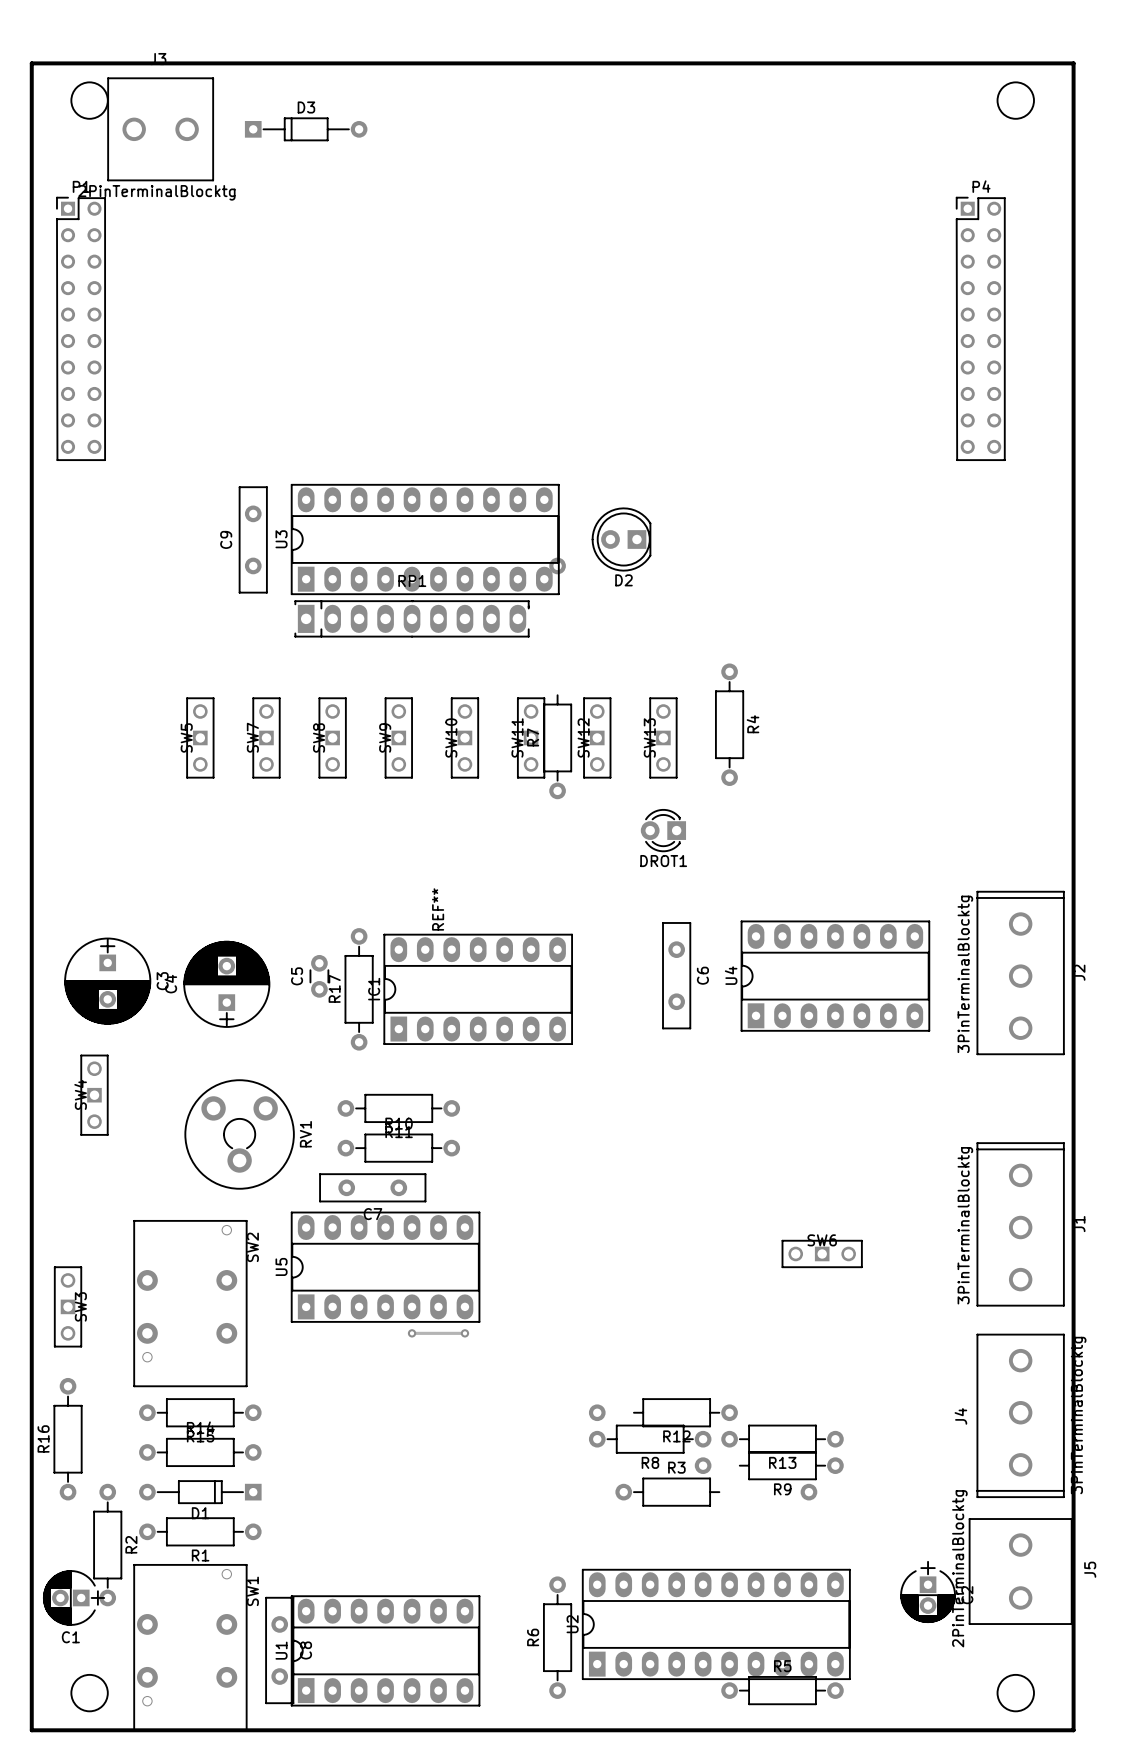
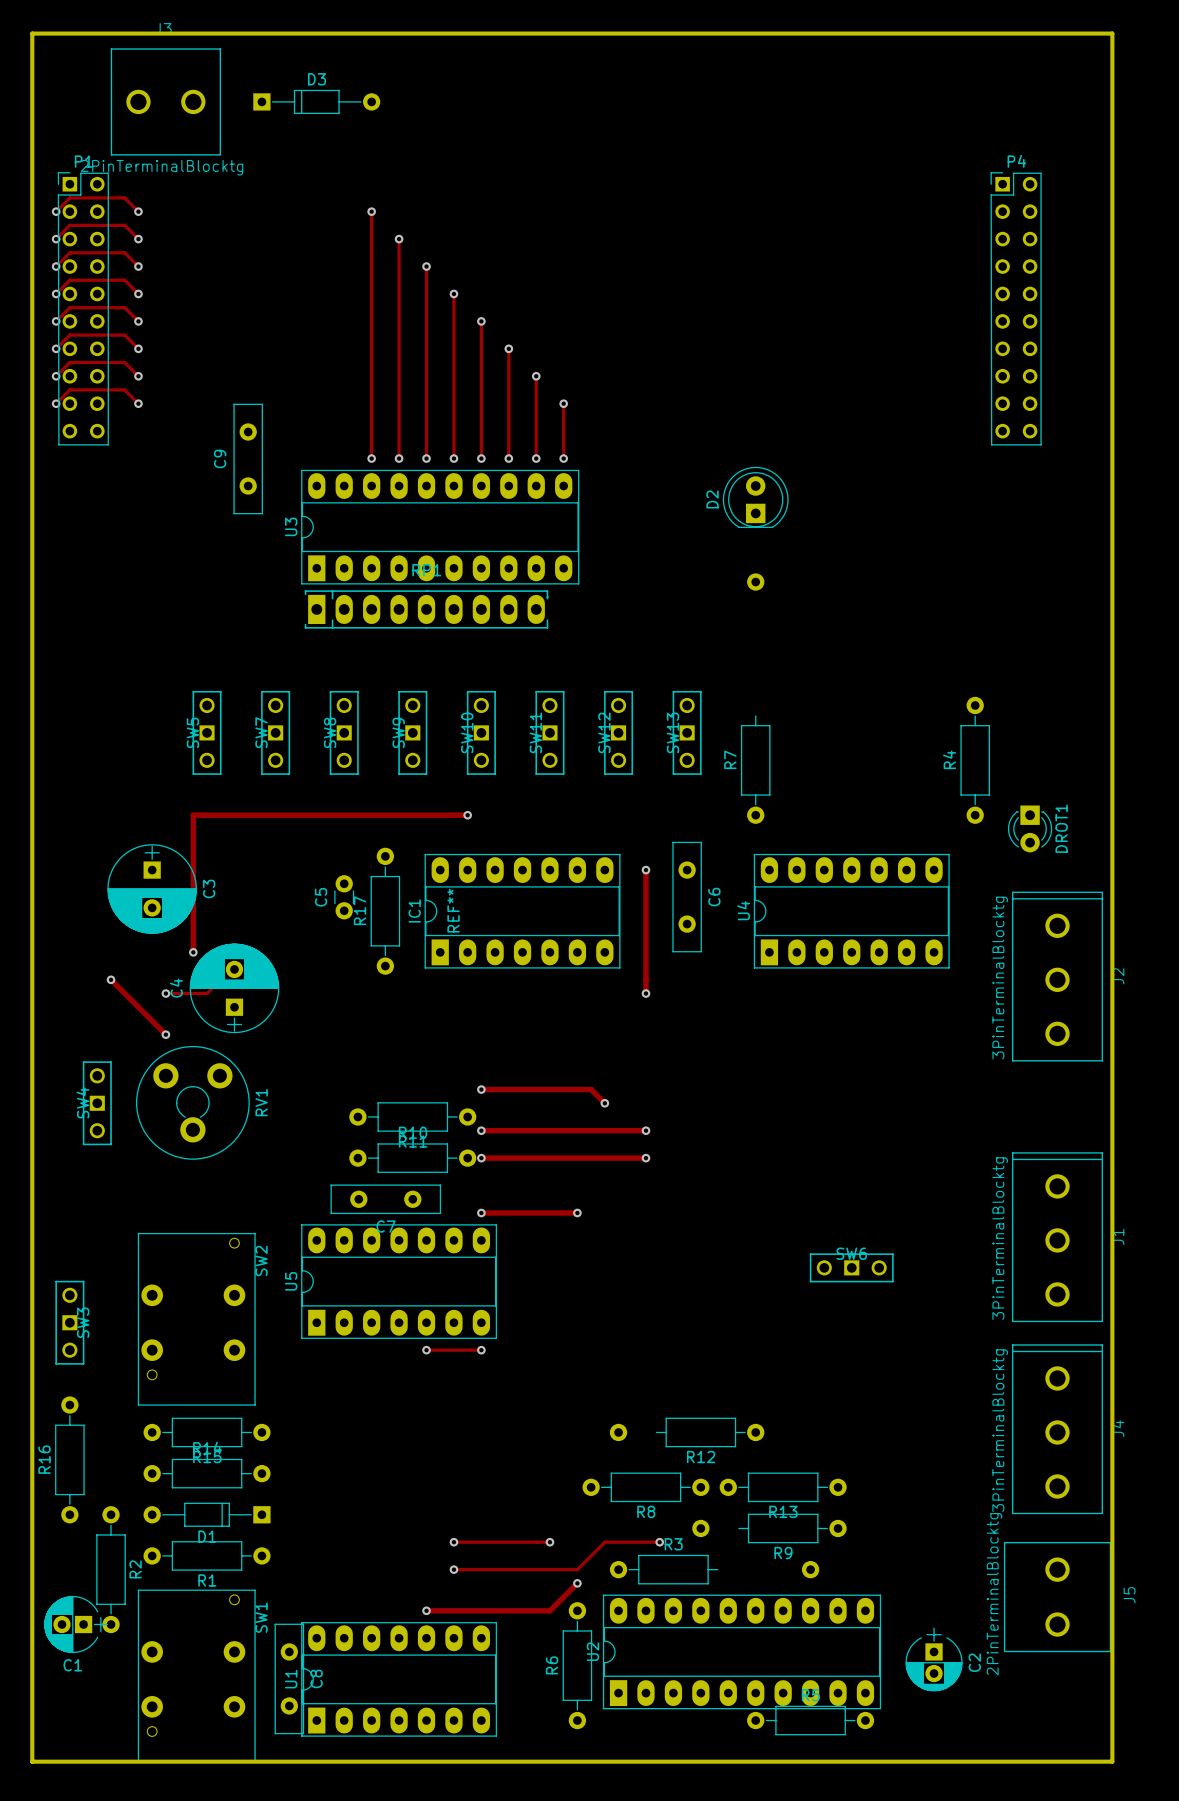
REF** footprint: [29, 61, 1076, 1733] -> [30, 31, 1115, 1764]
track: none -> (56, 211) (69, 197) (124, 197) (138, 211)
via: none -> (56, 211)
via: none -> (138, 211)
track: none -> (371, 211) (371, 458)
via: none -> (371, 211)
track: none -> (56, 239) (69, 225) (124, 225) (138, 239)
via: none -> (56, 239)
via: none -> (138, 239)
track: none -> (399, 239) (399, 458)
via: none -> (399, 239)
track: none -> (56, 266) (69, 252) (124, 252) (138, 266)
via: none -> (56, 266)
via: none -> (138, 266)
track: none -> (426, 266) (426, 458)
via: none -> (426, 266)
track: none -> (56, 293) (69, 280) (124, 280) (138, 293)
via: none -> (56, 293)
via: none -> (138, 293)
track: none -> (453, 293) (453, 458)
via: none -> (453, 293)
track: none -> (56, 321) (69, 307) (124, 307) (138, 321)
via: none -> (56, 321)
via: none -> (138, 321)
track: none -> (481, 321) (481, 458)
via: none -> (481, 321)
track: none -> (56, 348) (69, 335) (124, 335) (138, 348)
via: none -> (56, 348)
via: none -> (138, 348)
track: none -> (508, 348) (508, 458)
via: none -> (508, 348)
track: none -> (56, 376) (69, 362) (124, 362) (138, 376)
via: none -> (56, 376)
via: none -> (138, 376)
track: none -> (536, 376) (536, 458)
via: none -> (536, 376)
track: none -> (56, 403) (69, 389) (124, 389) (138, 403)
via: none -> (56, 403)
via: none -> (138, 403)
track: none -> (563, 403) (563, 458)
via: none -> (563, 403)
via: none -> (371, 458)
via: none -> (399, 458)
via: none -> (426, 458)
via: none -> (453, 458)
via: none -> (481, 458)
via: none -> (508, 458)
via: none -> (536, 458)
via: none -> (563, 458)
C9 position: (253, 539) -> (248, 459)
D2 rotation: 0° (621, 539) -> 90° clockwise (755, 497)
D2 position: (621, 539) -> (755, 497)
R7 position: (557, 678) -> (755, 698)
R4 position: (729, 724) -> (975, 760)
R4 name position: R4 (753, 724) -> R4 (949, 759)
track: none -> (467, 815) (193, 815) (193, 952)
via: none -> (467, 815)
DROT1 rotation: 0° (663, 830) -> 90° counterclockwise (1030, 828)
DROT1 position: (663, 830) -> (1030, 828)
track: none -> (645, 870) (645, 993)
via: none -> (645, 870)
via: none -> (193, 952)
C6 position: (676, 975) -> (687, 897)
track: none -> (111, 979) (165, 1034)
via: none -> (111, 979)
track: none -> (220, 979) (207, 993) (165, 993)
C5 position: (319, 976) -> (344, 897)
U4 position: (835, 976) -> (851, 911)
C3 position: (107, 981) -> (152, 888)
via: none -> (165, 993)
R17 position: (359, 989) -> (385, 911)
IC1 position: (478, 989) -> (522, 911)
via: none -> (645, 993)
via: none -> (165, 1034)
track: none -> (481, 1089) (591, 1089) (604, 1103)
via: none -> (481, 1089)
via: none -> (604, 1103)
track: none -> (481, 1130) (645, 1130)
via: none -> (481, 1130)
via: none -> (645, 1130)
RV1 position: (239, 1134) -> (192, 1102)
track: none -> (481, 1158) (645, 1158)
via: none -> (481, 1158)
via: none -> (645, 1158)
track: none -> (481, 1213) (577, 1213)
via: none -> (481, 1213)
via: none -> (577, 1213)
J4 rotation: 0° (1020, 1415) -> 180° (1057, 1429)
R8 position: (650, 1439) -> (645, 1487)
R13 position: (782, 1439) -> (783, 1487)
R9 position: (769, 1465) -> (769, 1528)
R3 position: (716, 1492) -> (714, 1569)
track: none -> (453, 1542) (549, 1542)
via: none -> (453, 1542)
via: none -> (549, 1542)
track: none -> (659, 1542) (604, 1542) (577, 1569) (453, 1569)
via: none -> (659, 1542)
via: none -> (453, 1569)
track: none -> (577, 1583) (549, 1610) (426, 1610)
via: none -> (577, 1583)
via: none -> (426, 1610)
C2 position: (928, 1591) -> (934, 1659)

